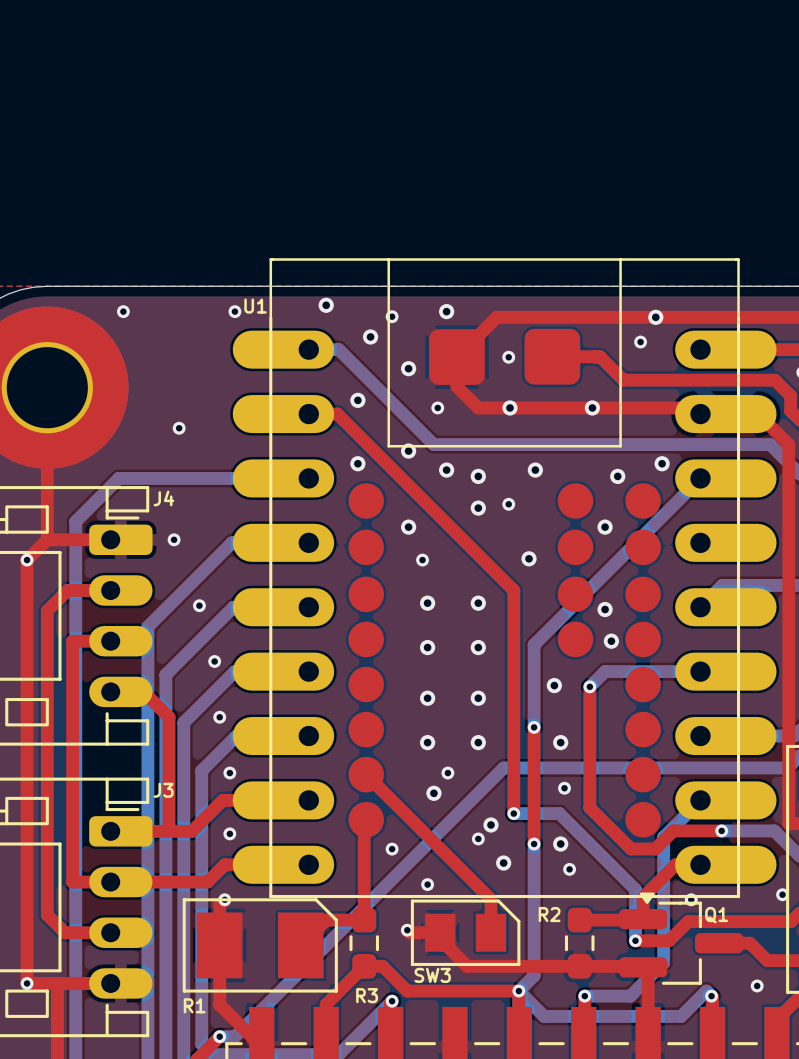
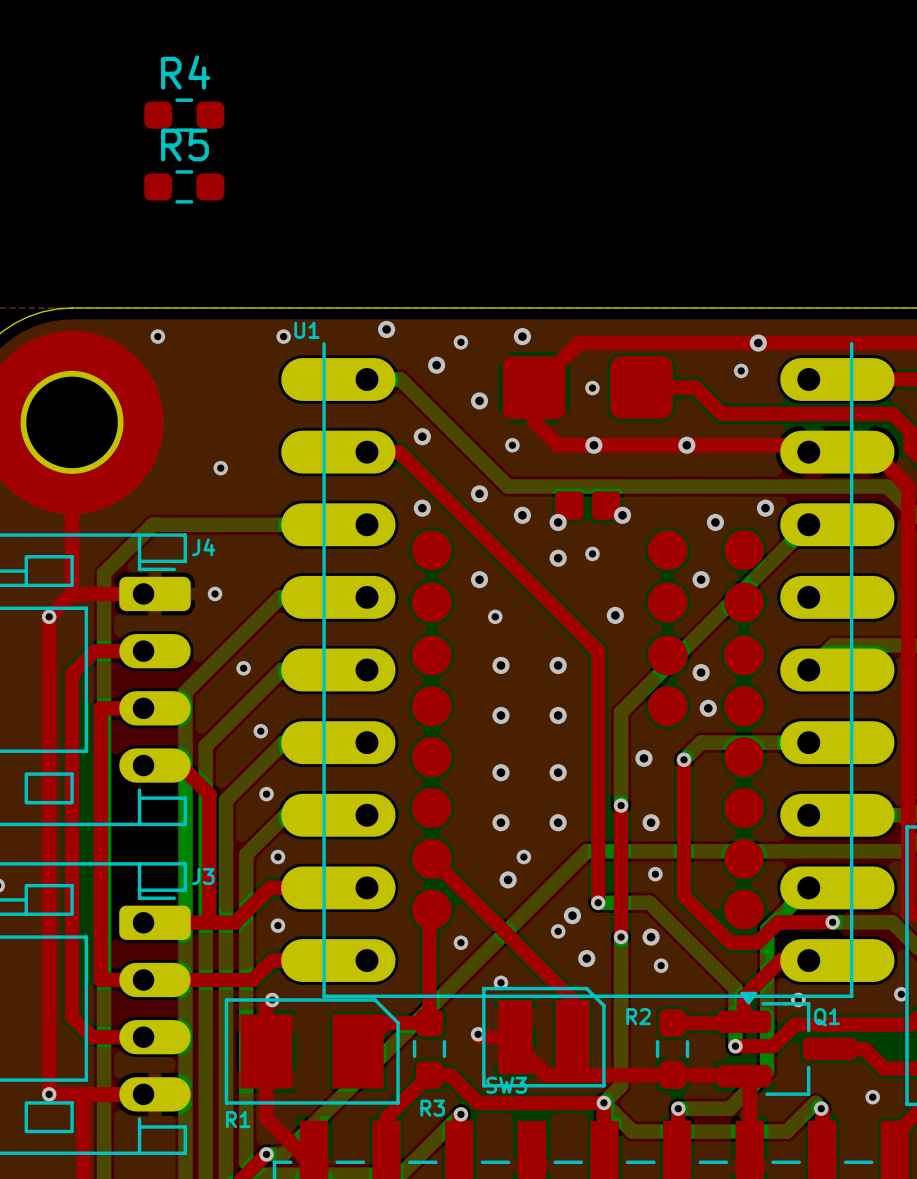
R4: none -> (184, 115)
R5: none -> (184, 186)
U1 footprint: [232, 258, 777, 899] -> [281, 342, 895, 999]
SW3 footprint: [410, 899, 521, 966] -> [482, 986, 606, 1088]

